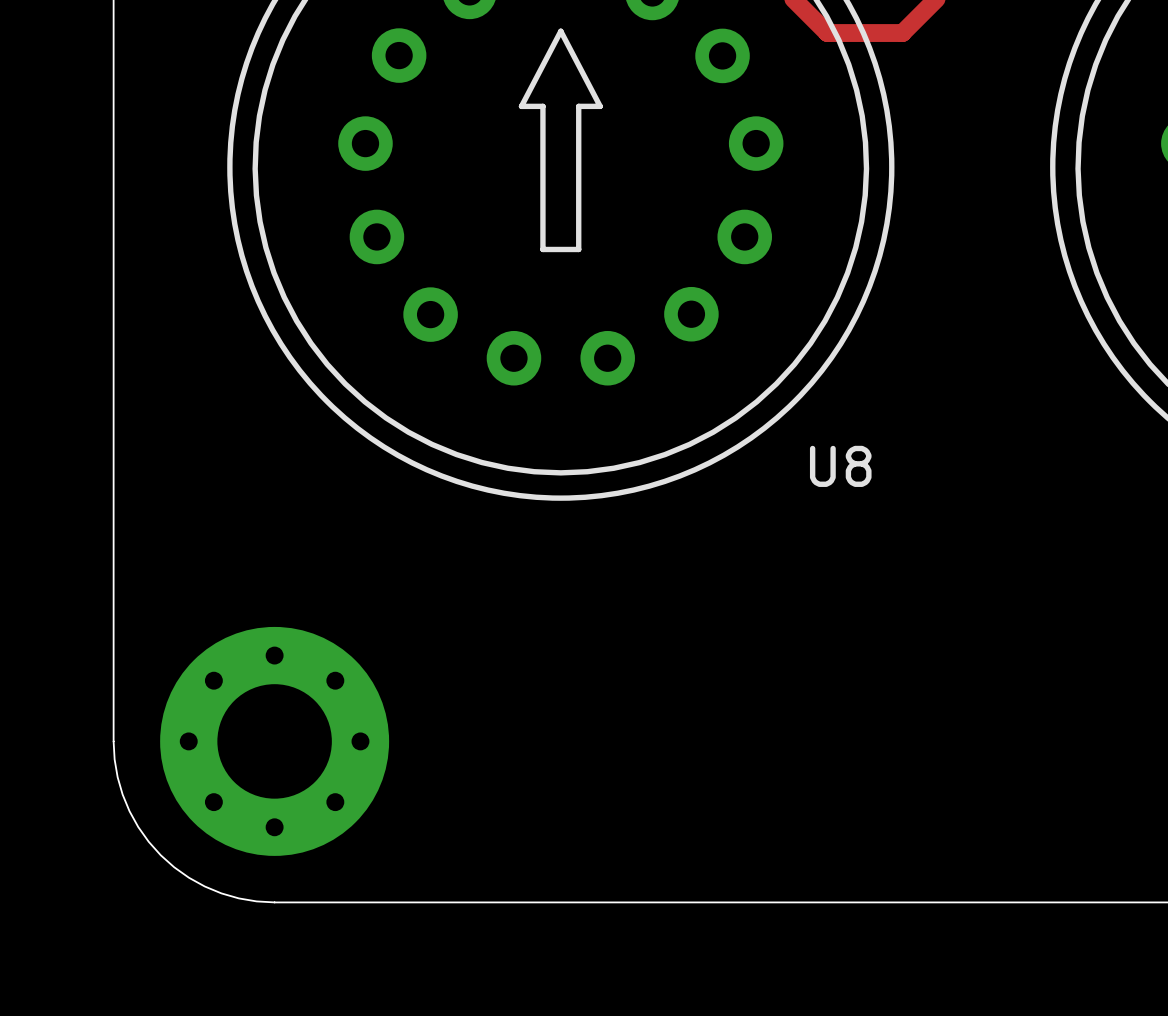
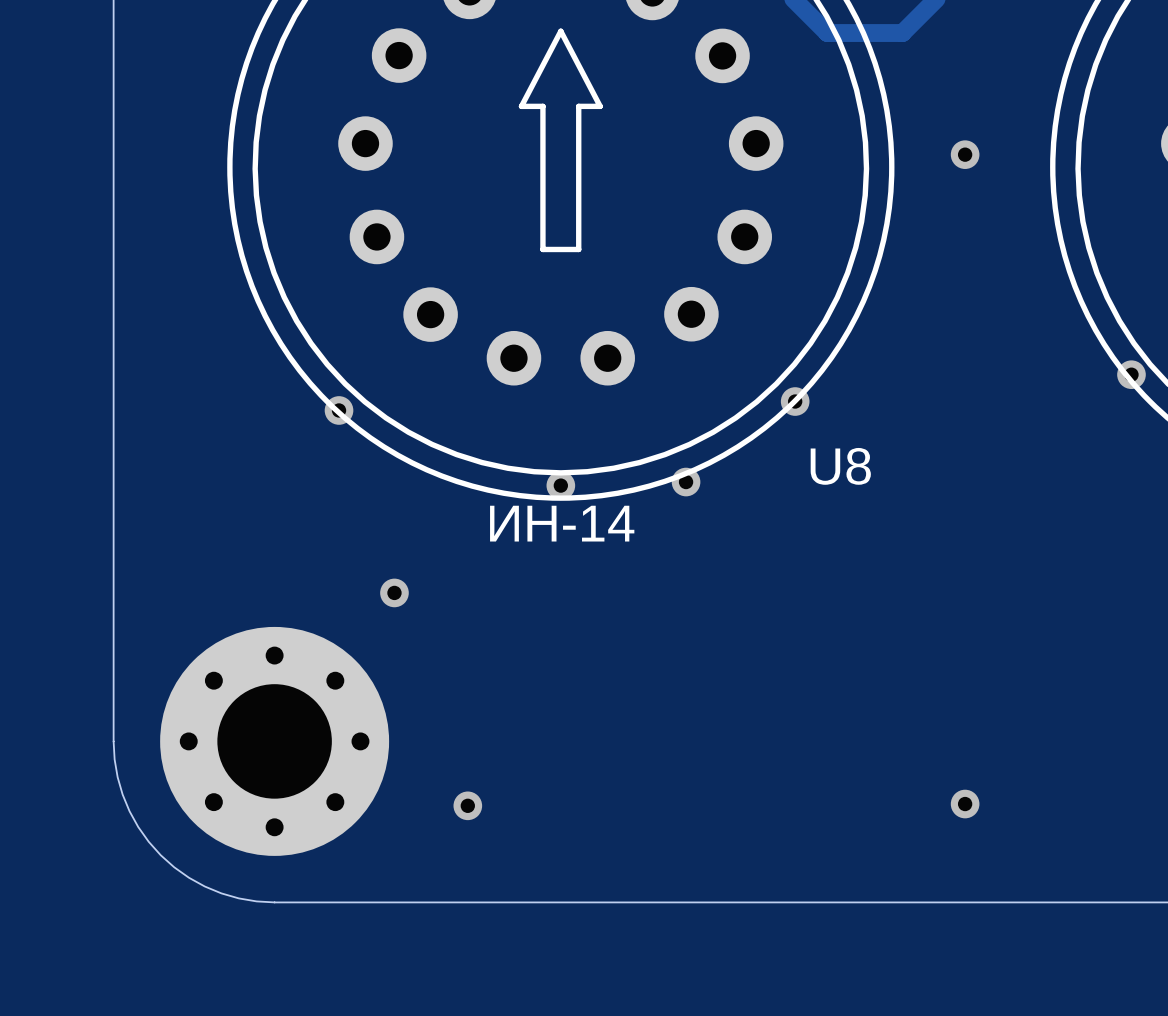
via: none -> (965, 154)
via: none -> (1131, 374)
via: none -> (795, 401)
via: none -> (339, 410)
via: none -> (686, 482)
via: none -> (560, 485)
text: none -> ИH-14 (562, 523)
via: none -> (394, 592)
via: none -> (965, 804)
via: none -> (467, 805)

